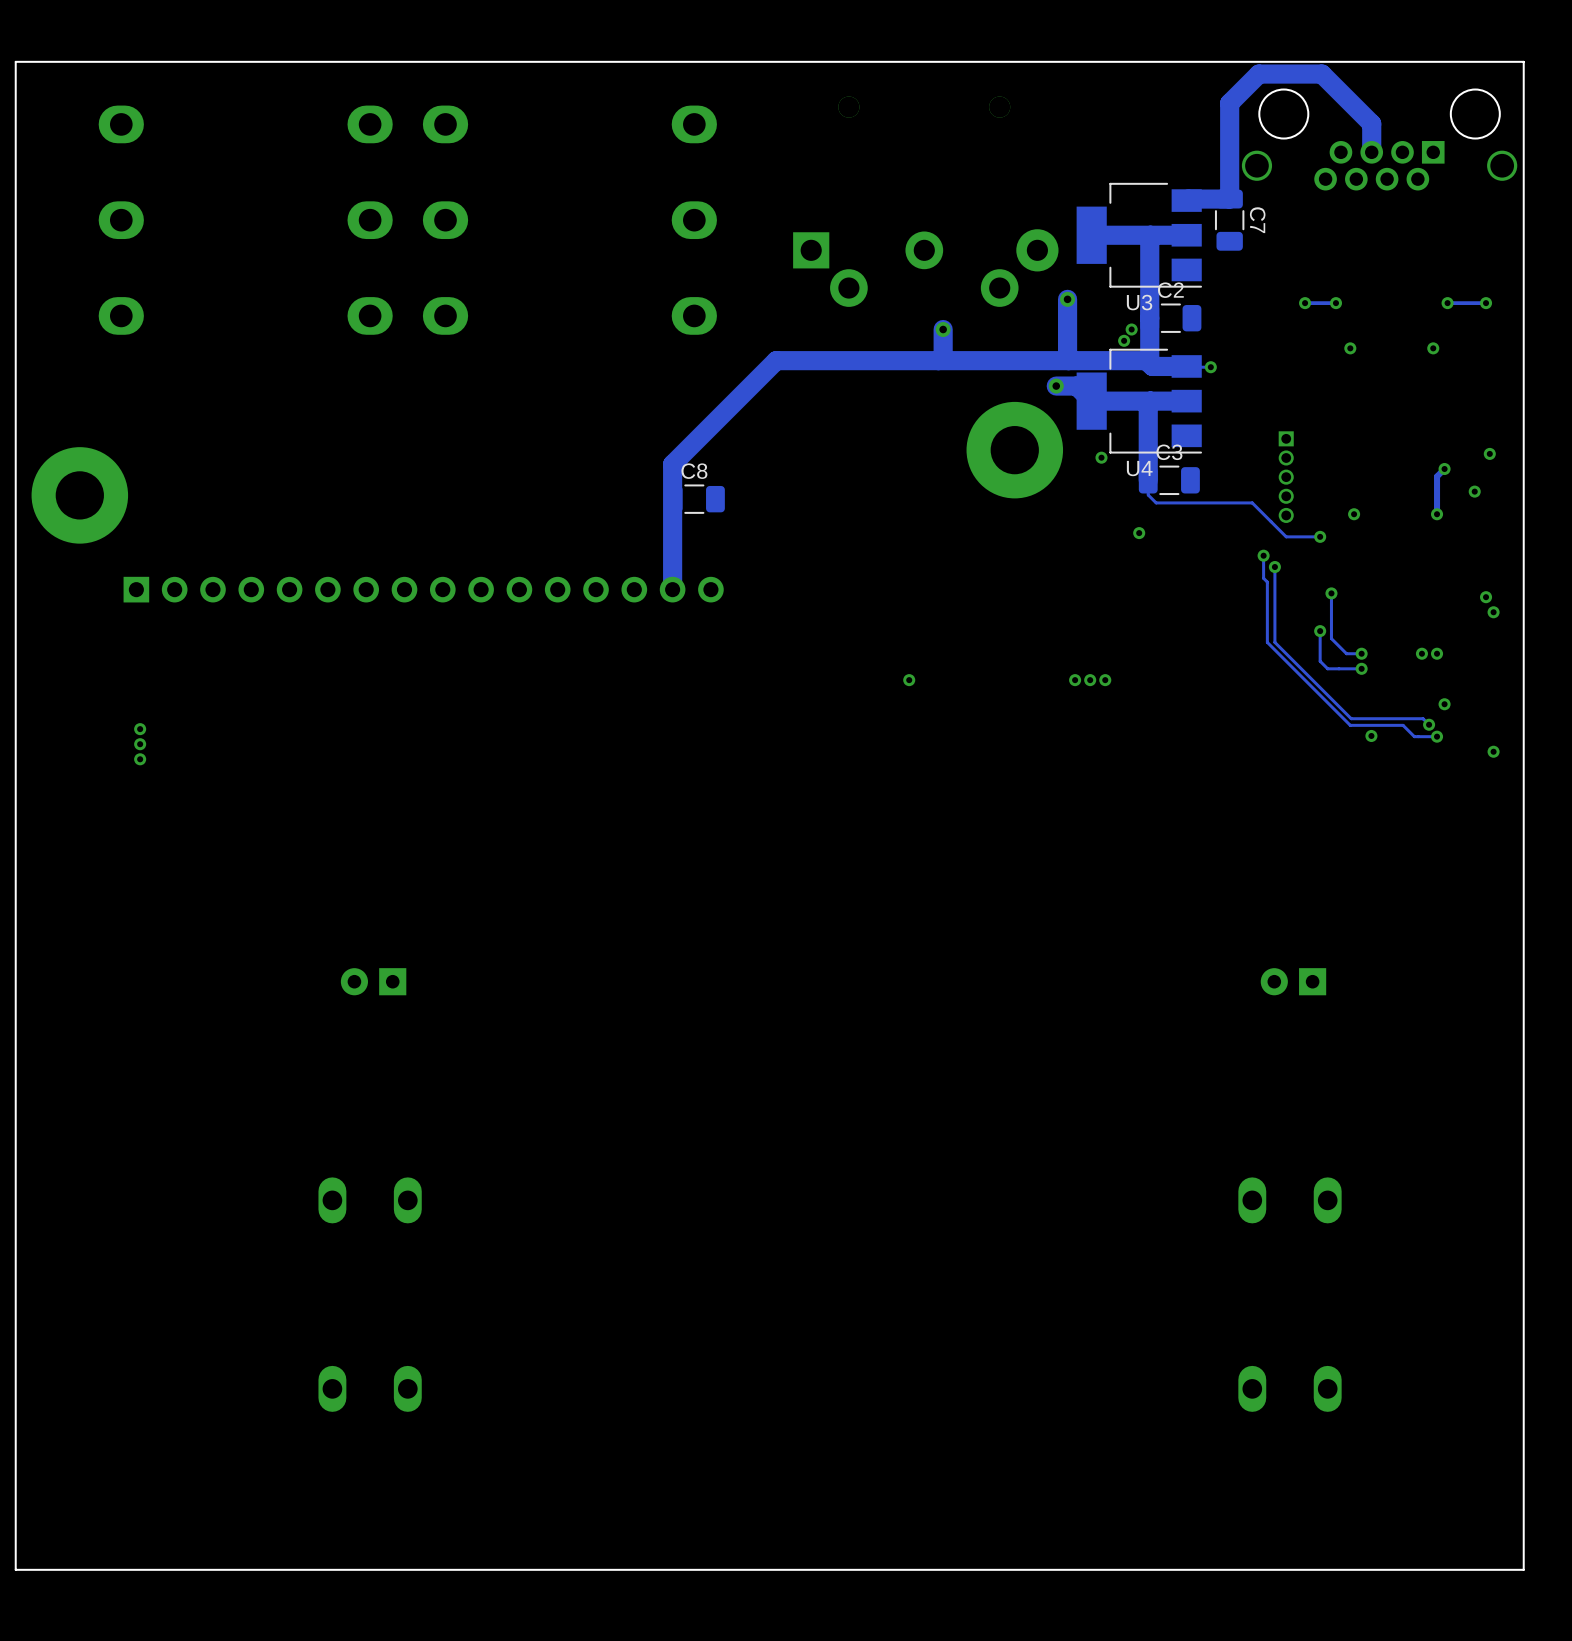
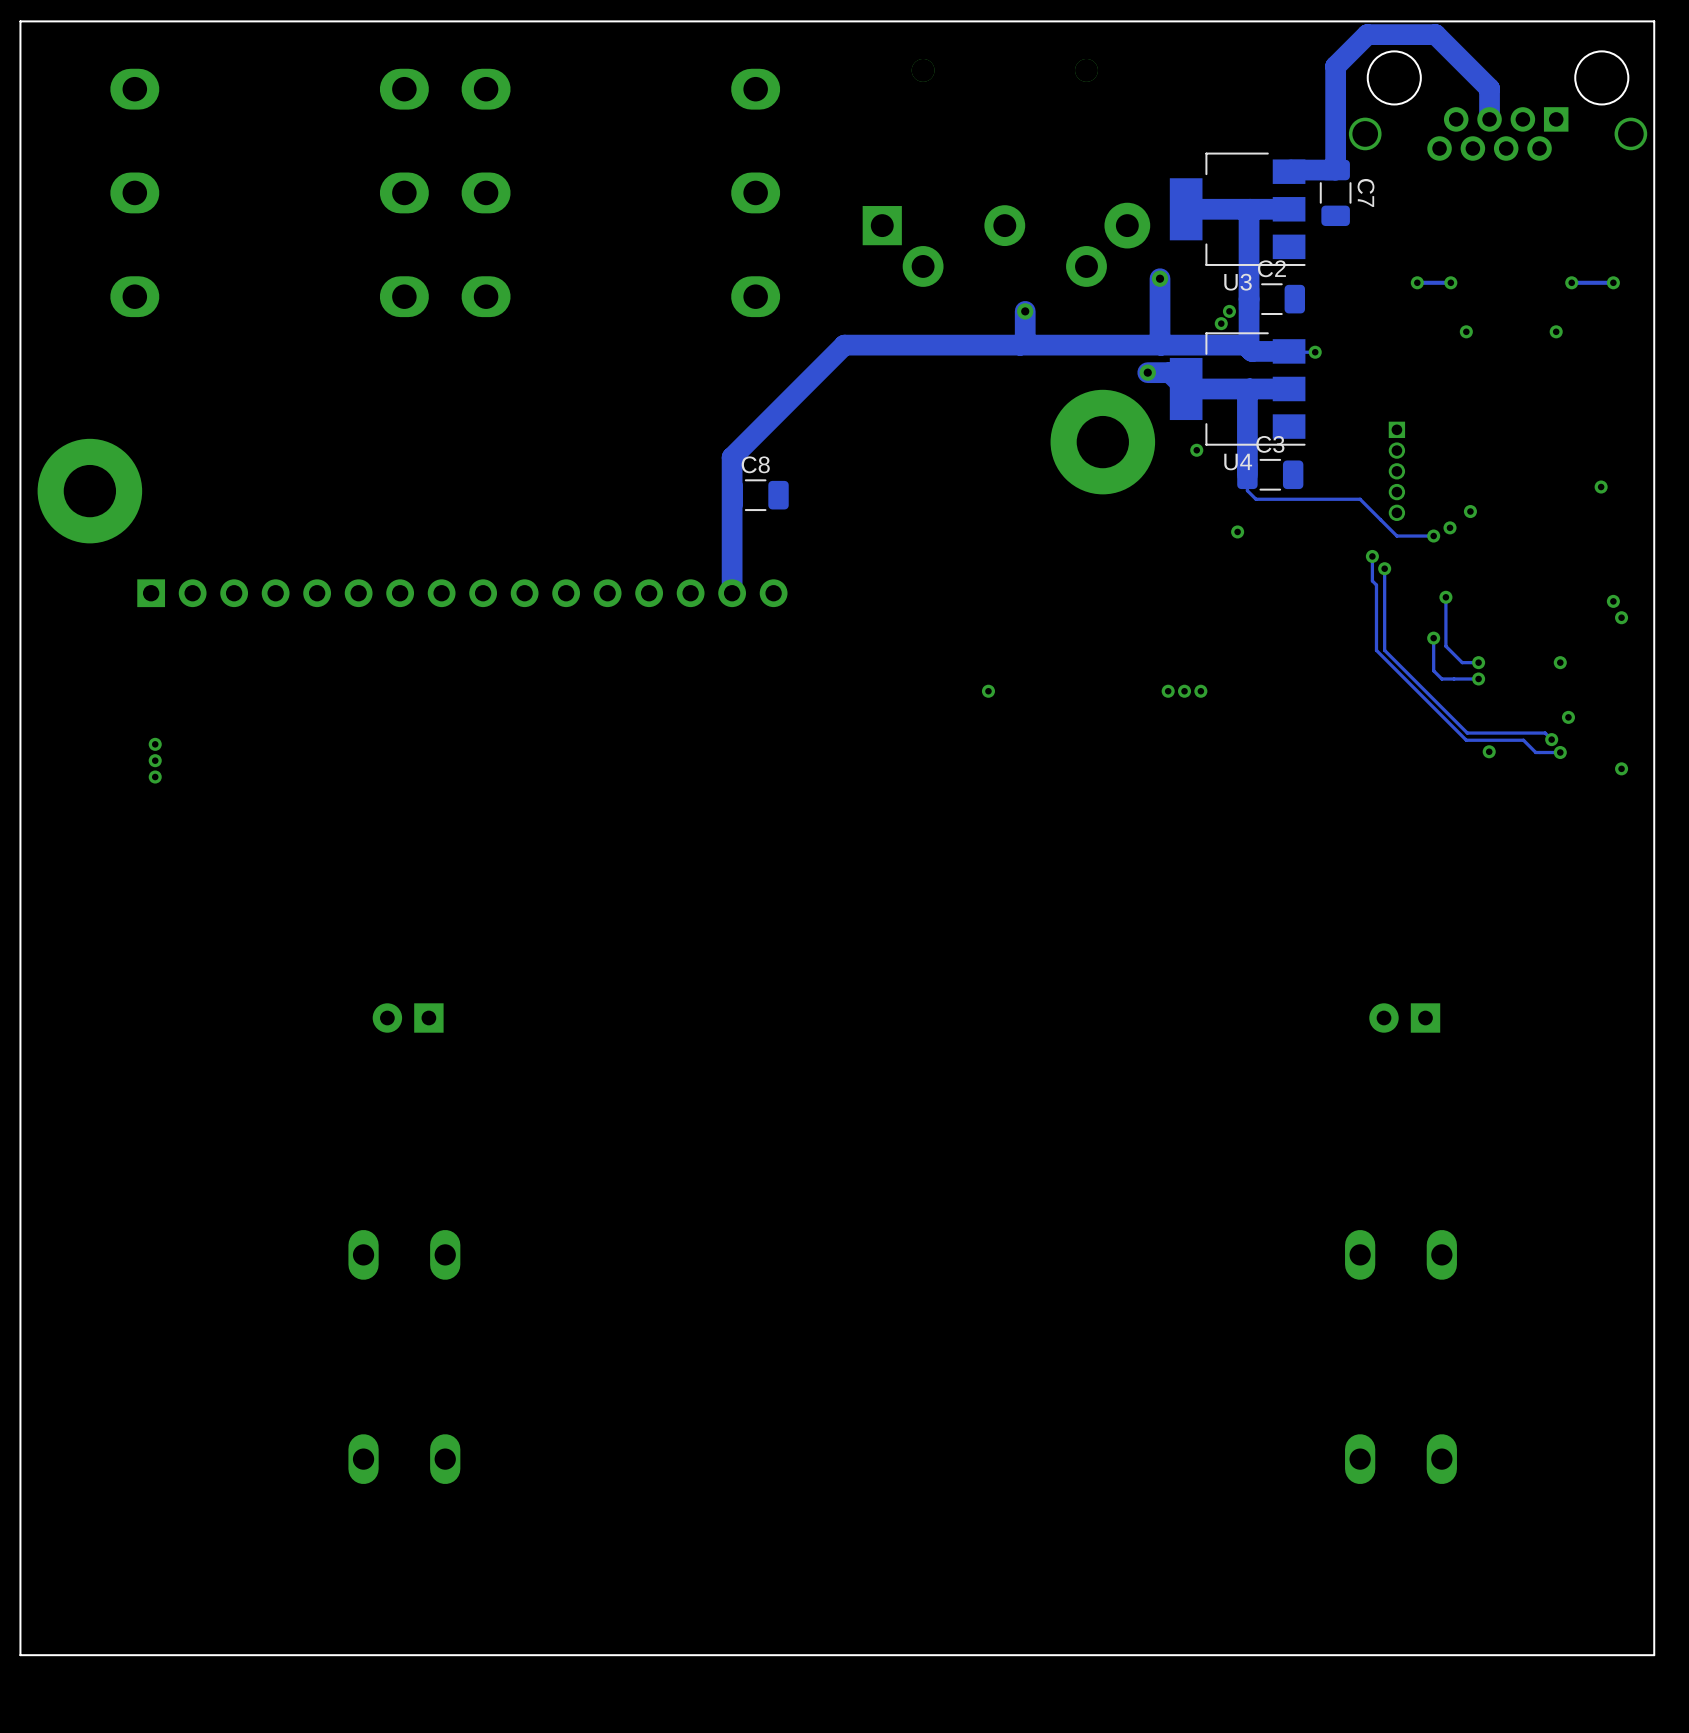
via: (1489, 453) -> none
track: (1444, 469) (1437, 476) (1437, 514) -> none
via: (1444, 469) -> none
via: (1437, 514) -> none
via: none -> (1450, 527)
via: (1421, 653) -> none

